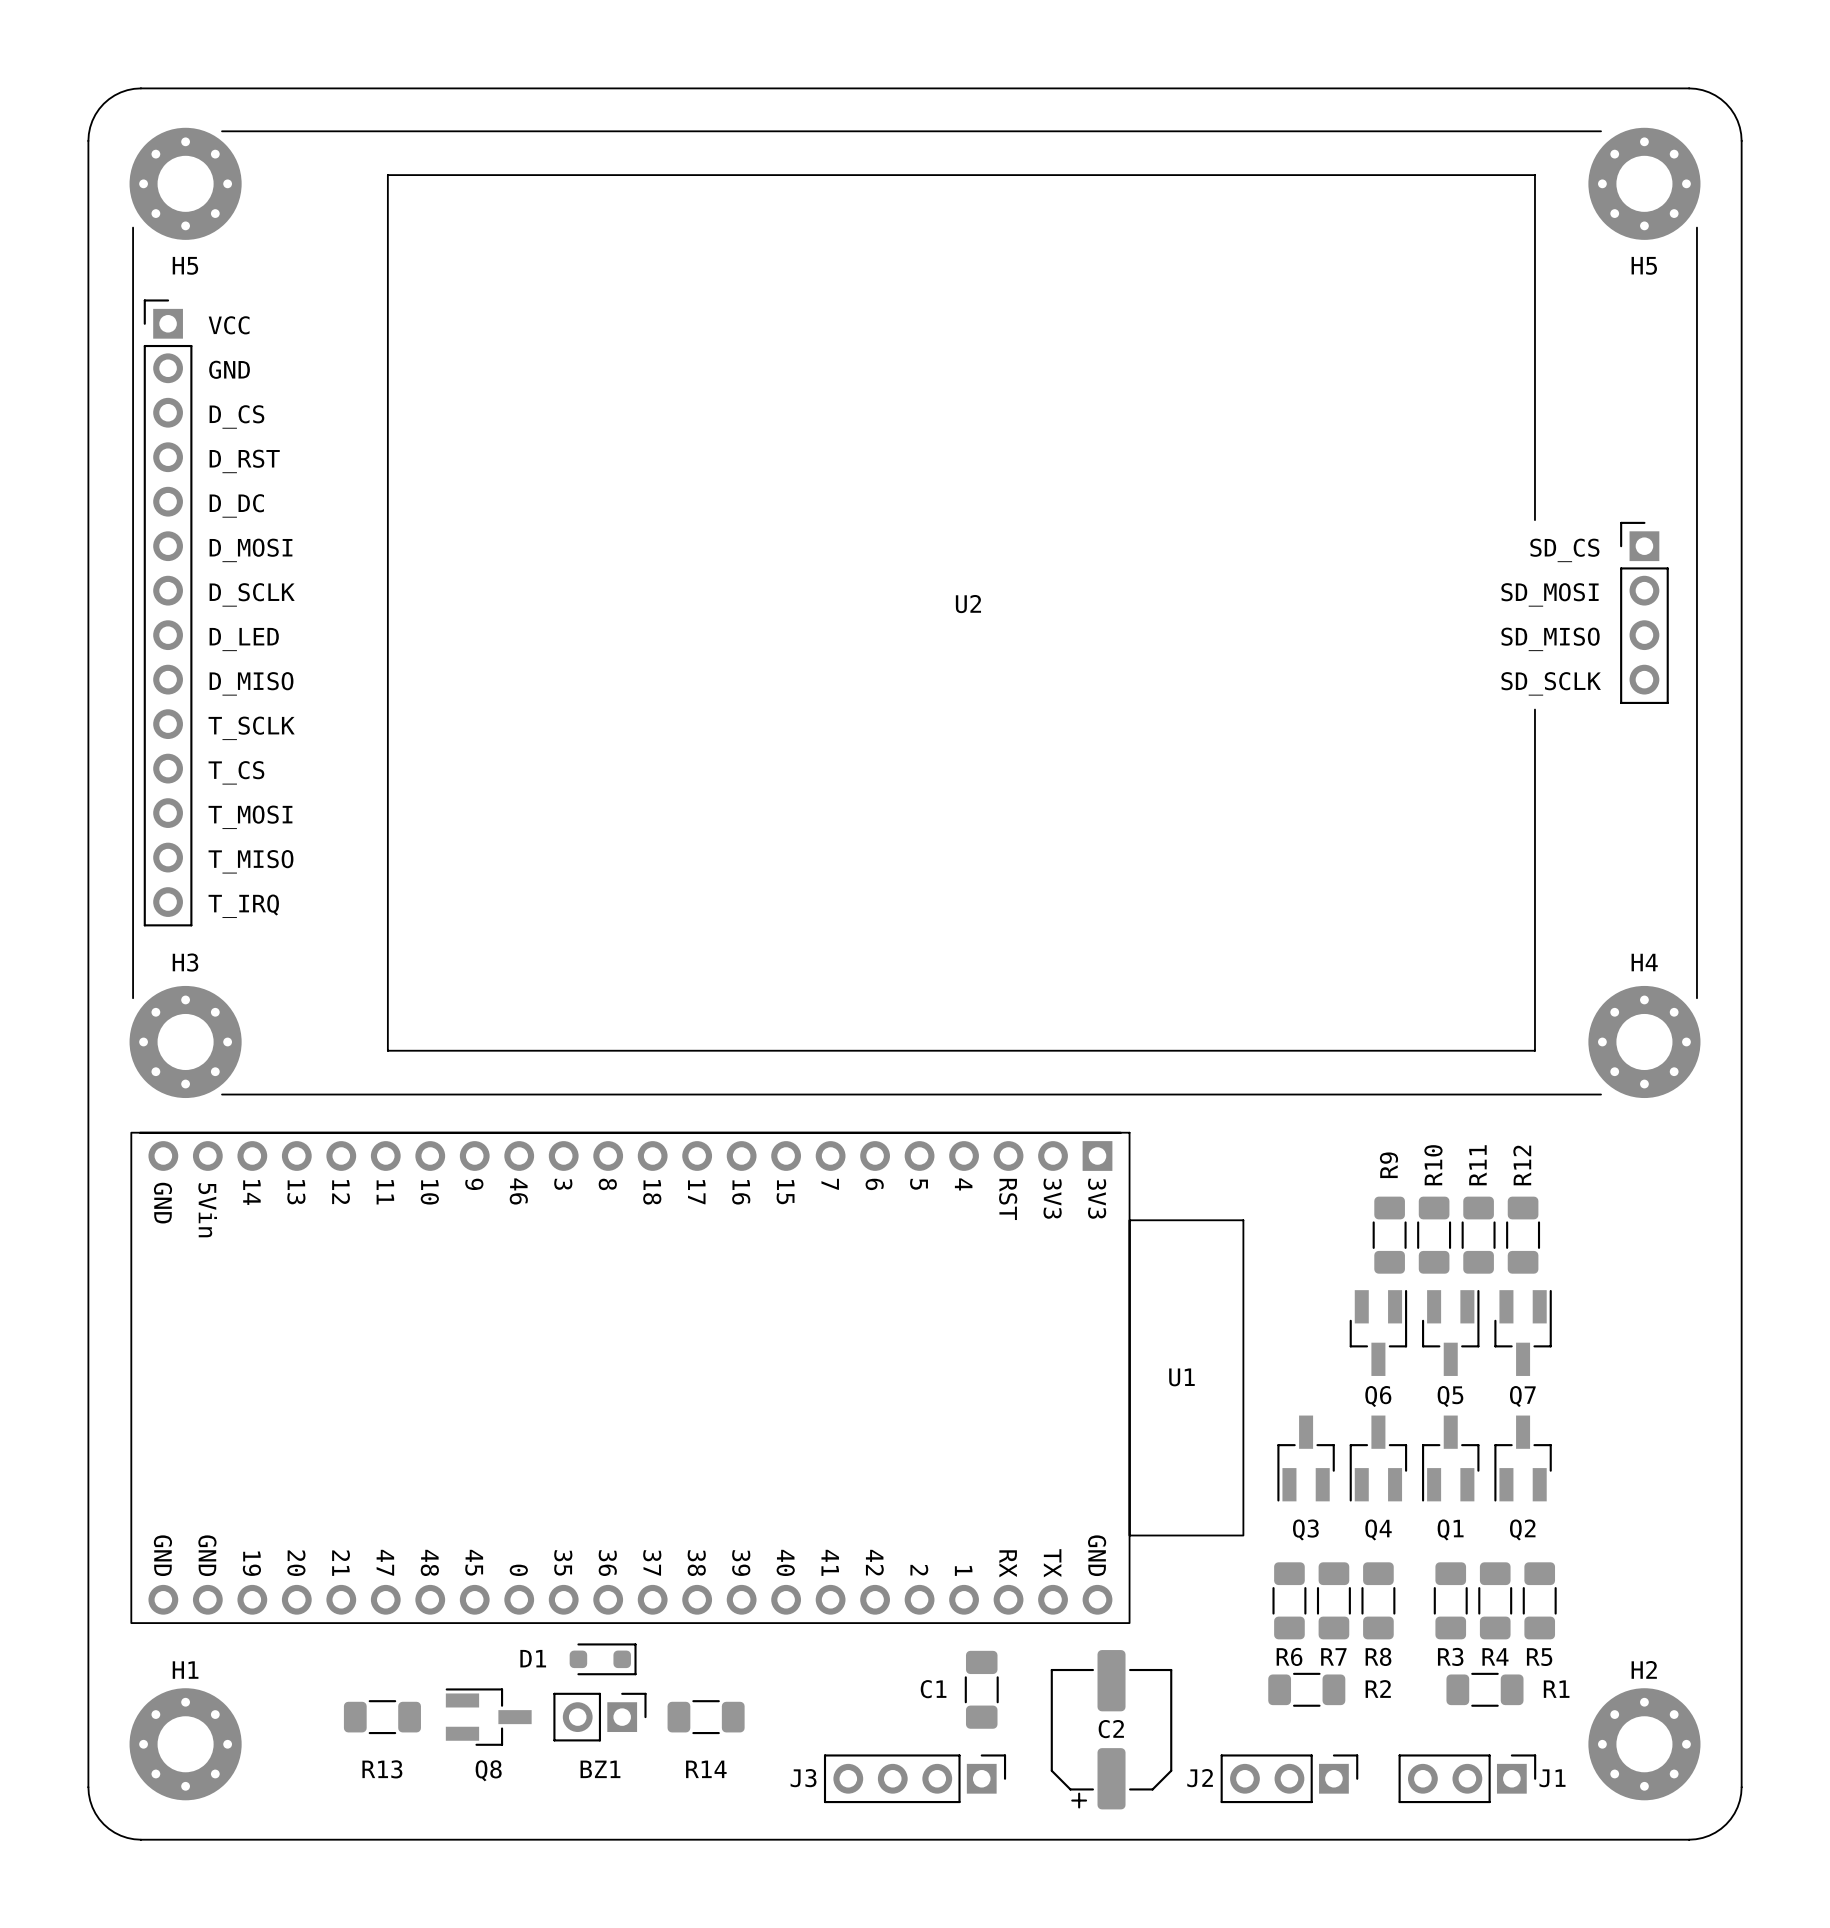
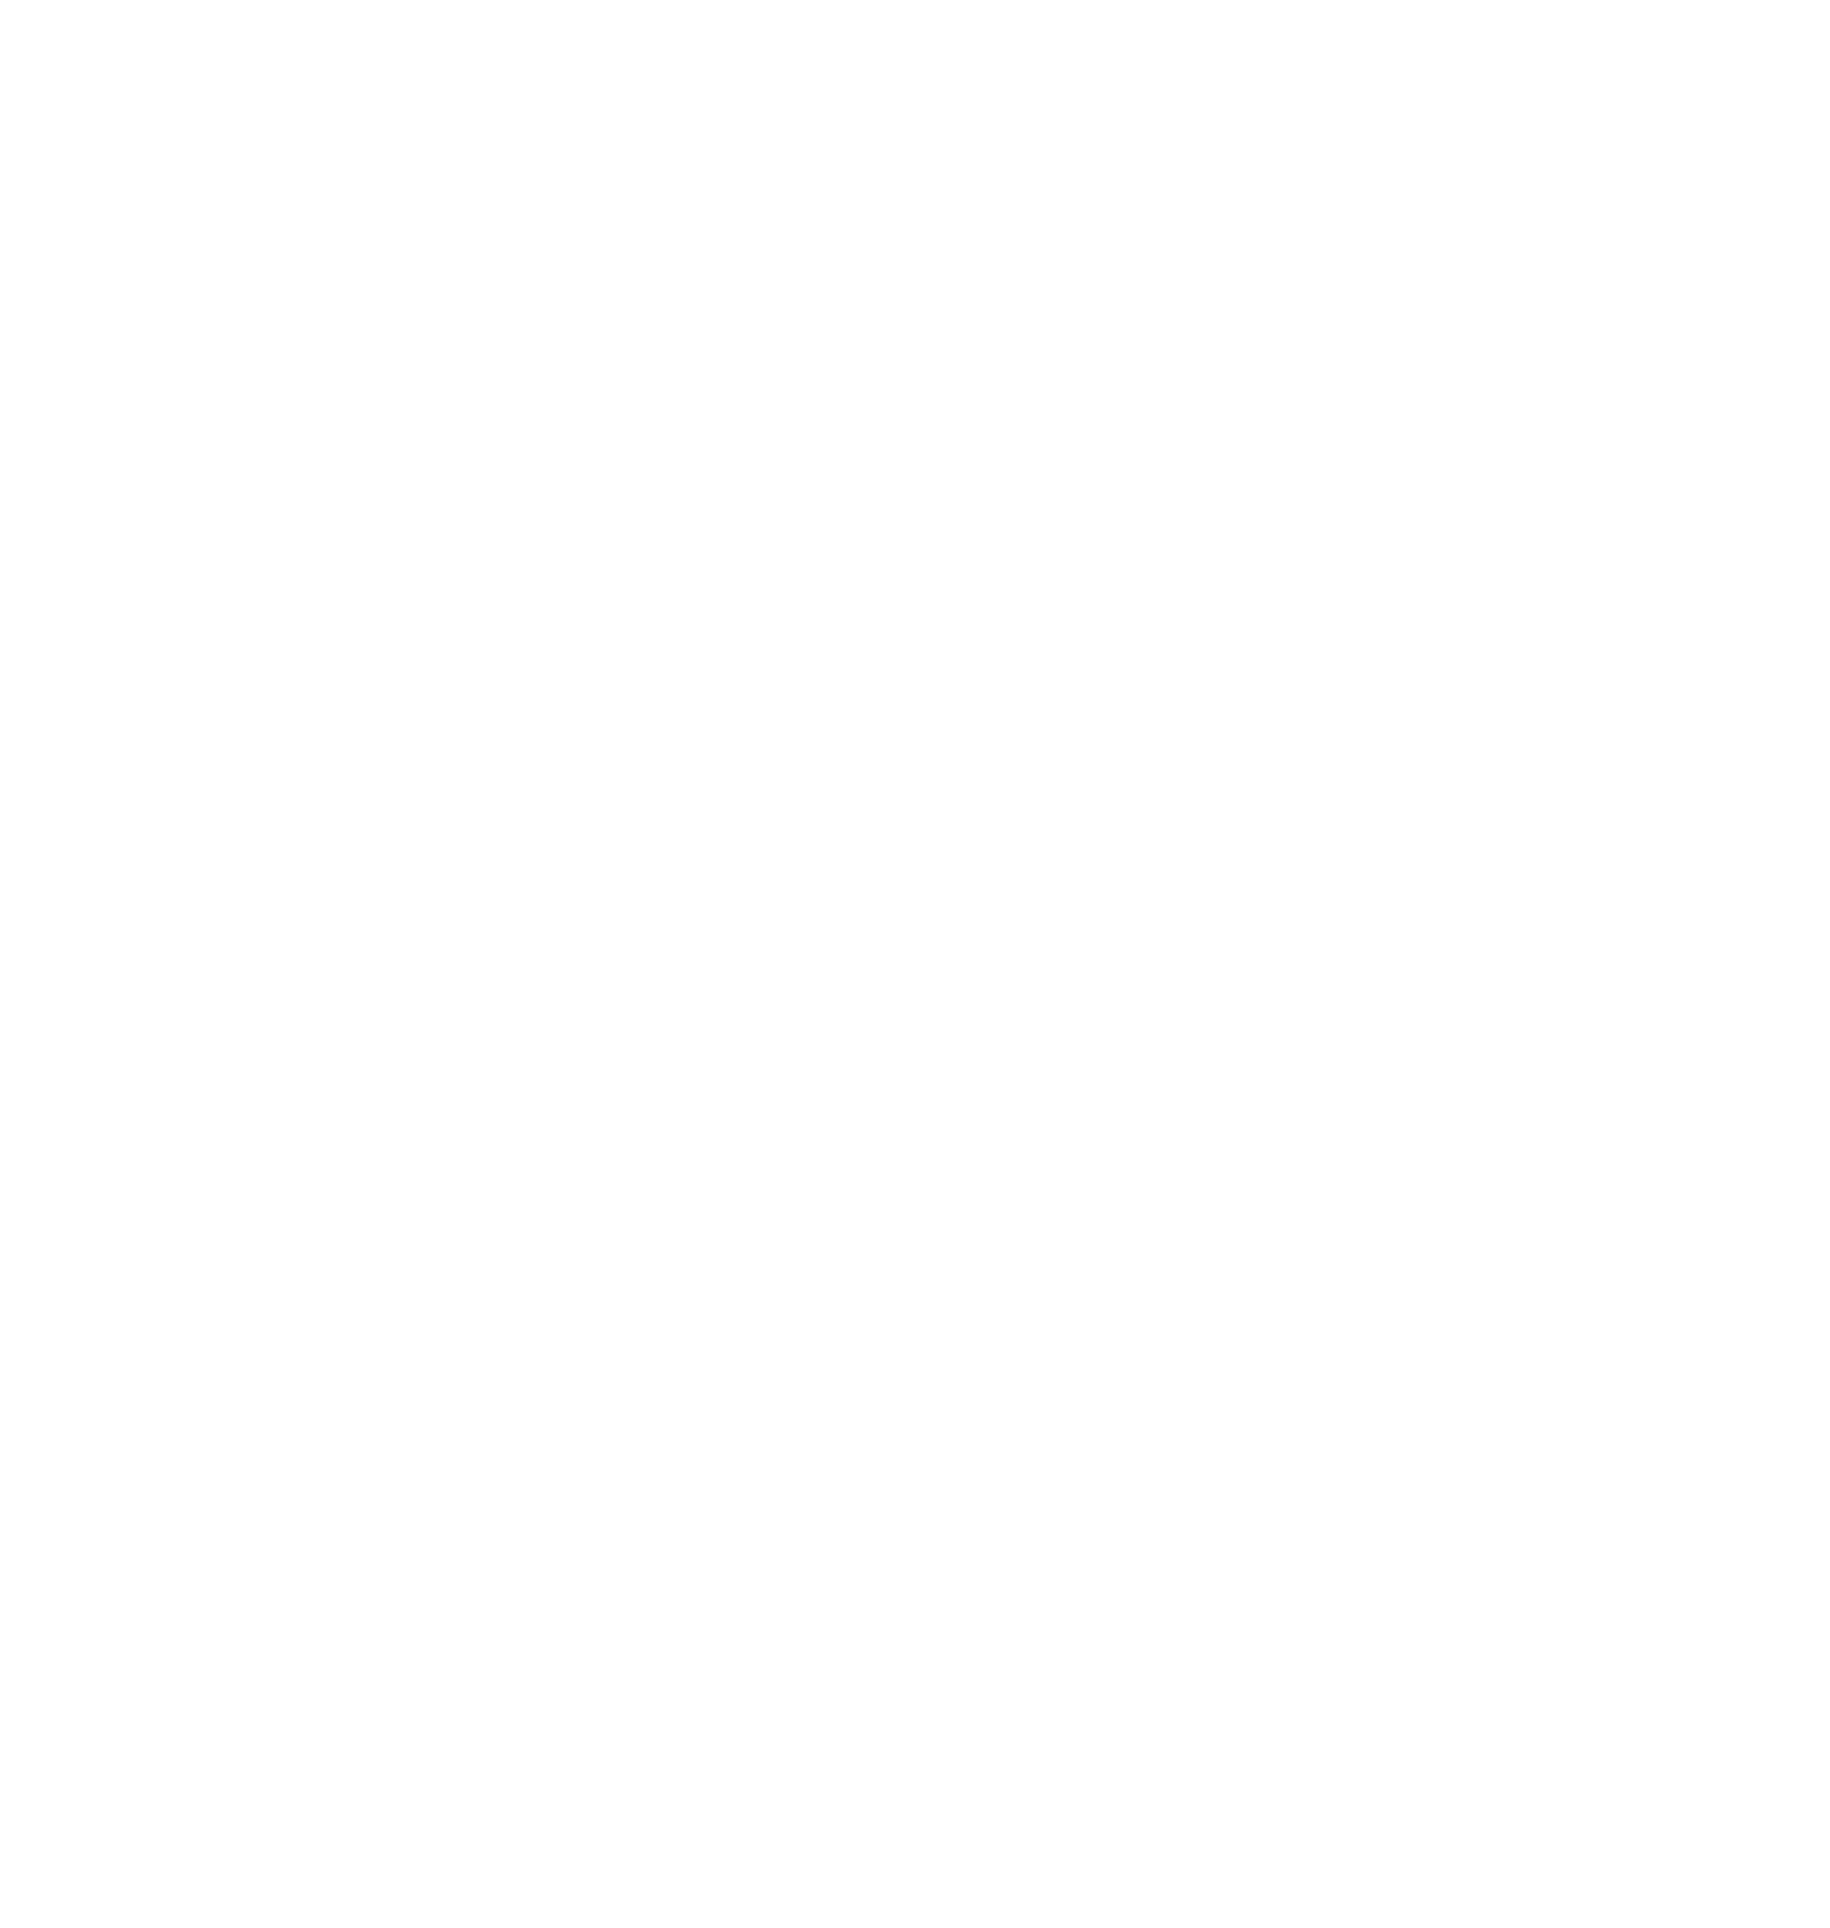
board edge: (140, 88) (1689, 88) (1709, 92) (1726, 103) (1737, 120) (1741, 140) (1741, 1787) (1737, 1807) (1726, 1824) (1709, 1835) (1689, 1839) (140, 1839) (120, 1835) (103, 1824) (92, 1807) (88, 1787) (88, 140) (92, 120) (103, 103) (120, 92) (140, 88) -> none
text: H5 (185, 265) -> none
text: H5 (1644, 265) -> none
U2: (915, 612) -> none
text: H3 (185, 962) -> none
text: H4 (1644, 962) -> none
R9: (1389, 1235) -> none
R10: (1434, 1235) -> none
R11: (1478, 1235) -> none
R12: (1523, 1235) -> none
Q6: (1378, 1332) -> none
Q5: (1450, 1332) -> none
Q7: (1523, 1332) -> none
U1: (687, 1377) -> none
Q3: (1306, 1458) -> none
Q4: (1378, 1458) -> none
Q1: (1450, 1458) -> none
Q2: (1523, 1458) -> none
R6: (1289, 1600) -> none
R7: (1333, 1600) -> none
R8: (1378, 1600) -> none
R3: (1450, 1600) -> none
R4: (1495, 1600) -> none
R5: (1539, 1600) -> none
D1: (603, 1659) -> none
C1: (981, 1689) -> none
R2: (1306, 1689) -> none
R1: (1484, 1689) -> none
R13: (382, 1717) -> none
Q8: (488, 1717) -> none
BZ1: (599, 1717) -> none
R14: (706, 1717) -> none
C2: (1111, 1729) -> none
H1: (185, 1744) -> none
H2: (1644, 1744) -> none
J3: (915, 1778) -> none
J2: (1289, 1778) -> none
J1: (1467, 1778) -> none

